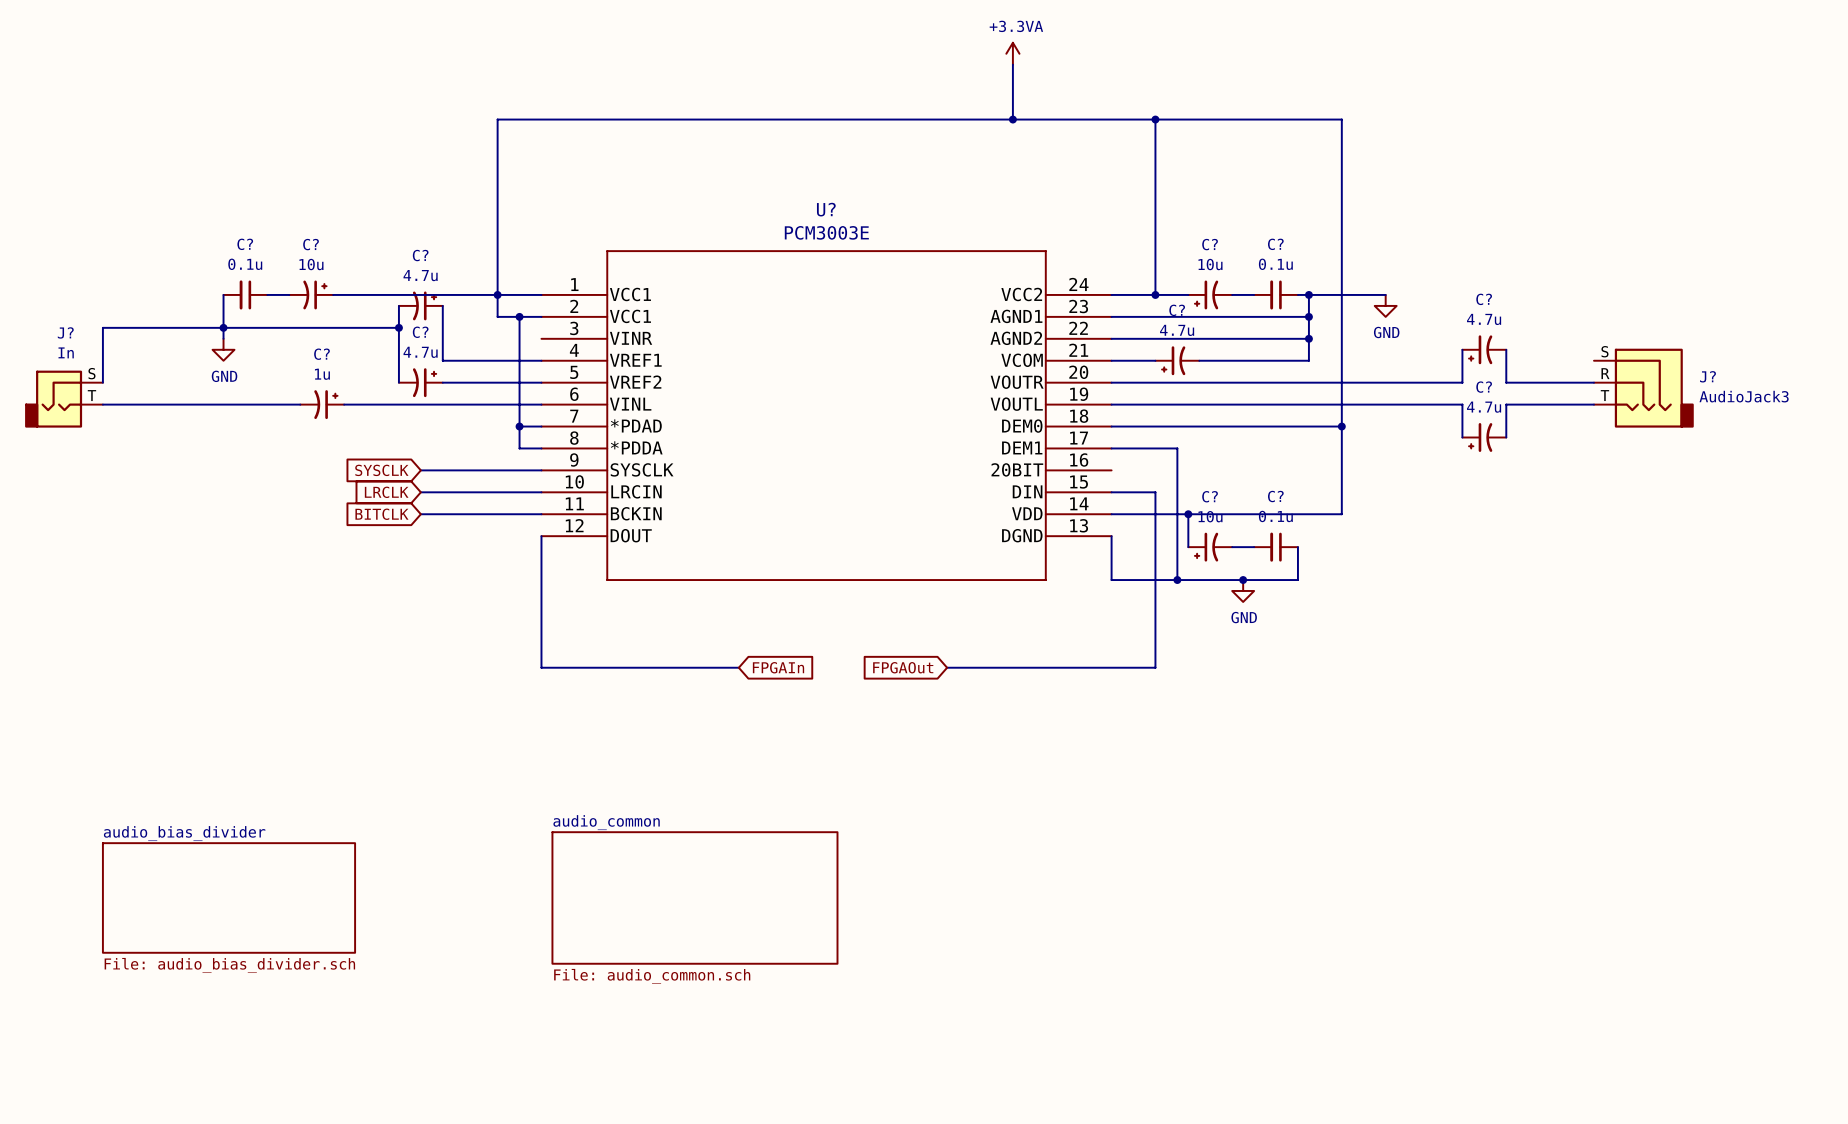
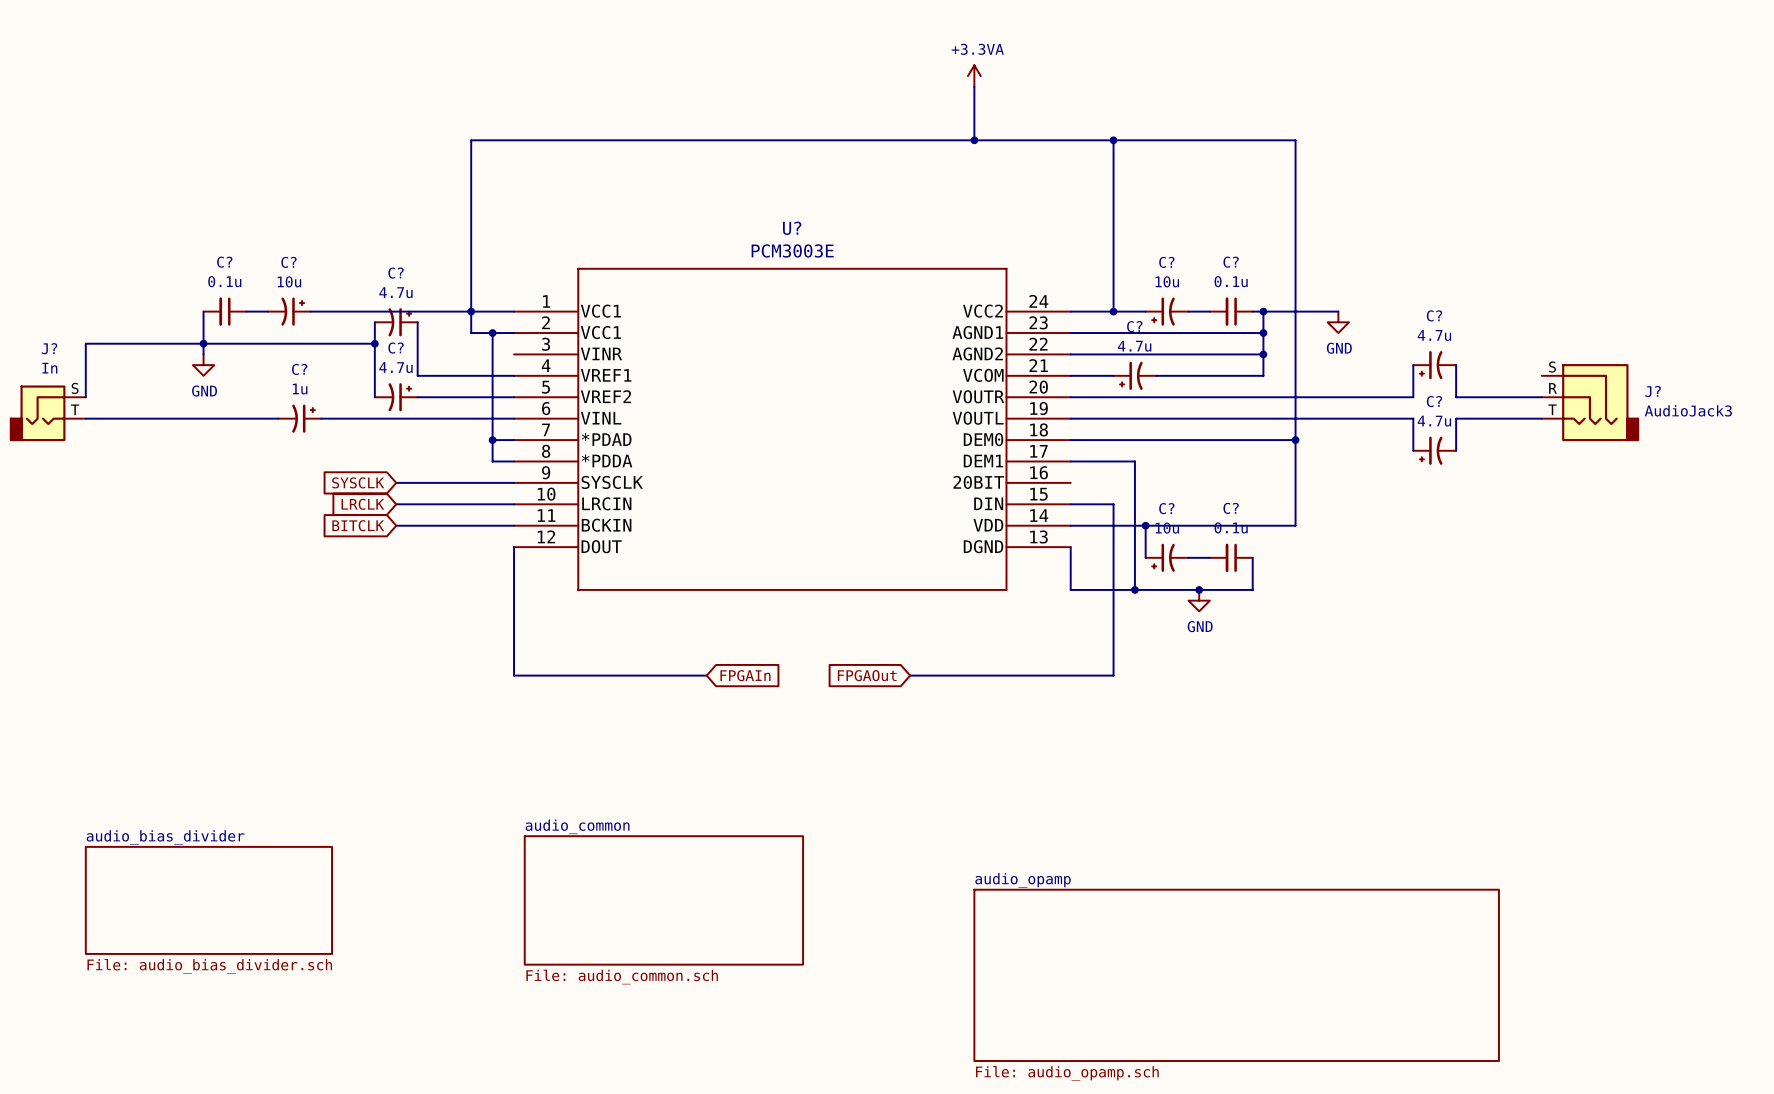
sheet audio_opamp: none -> File: audio_opamp.sch (1236, 975)

